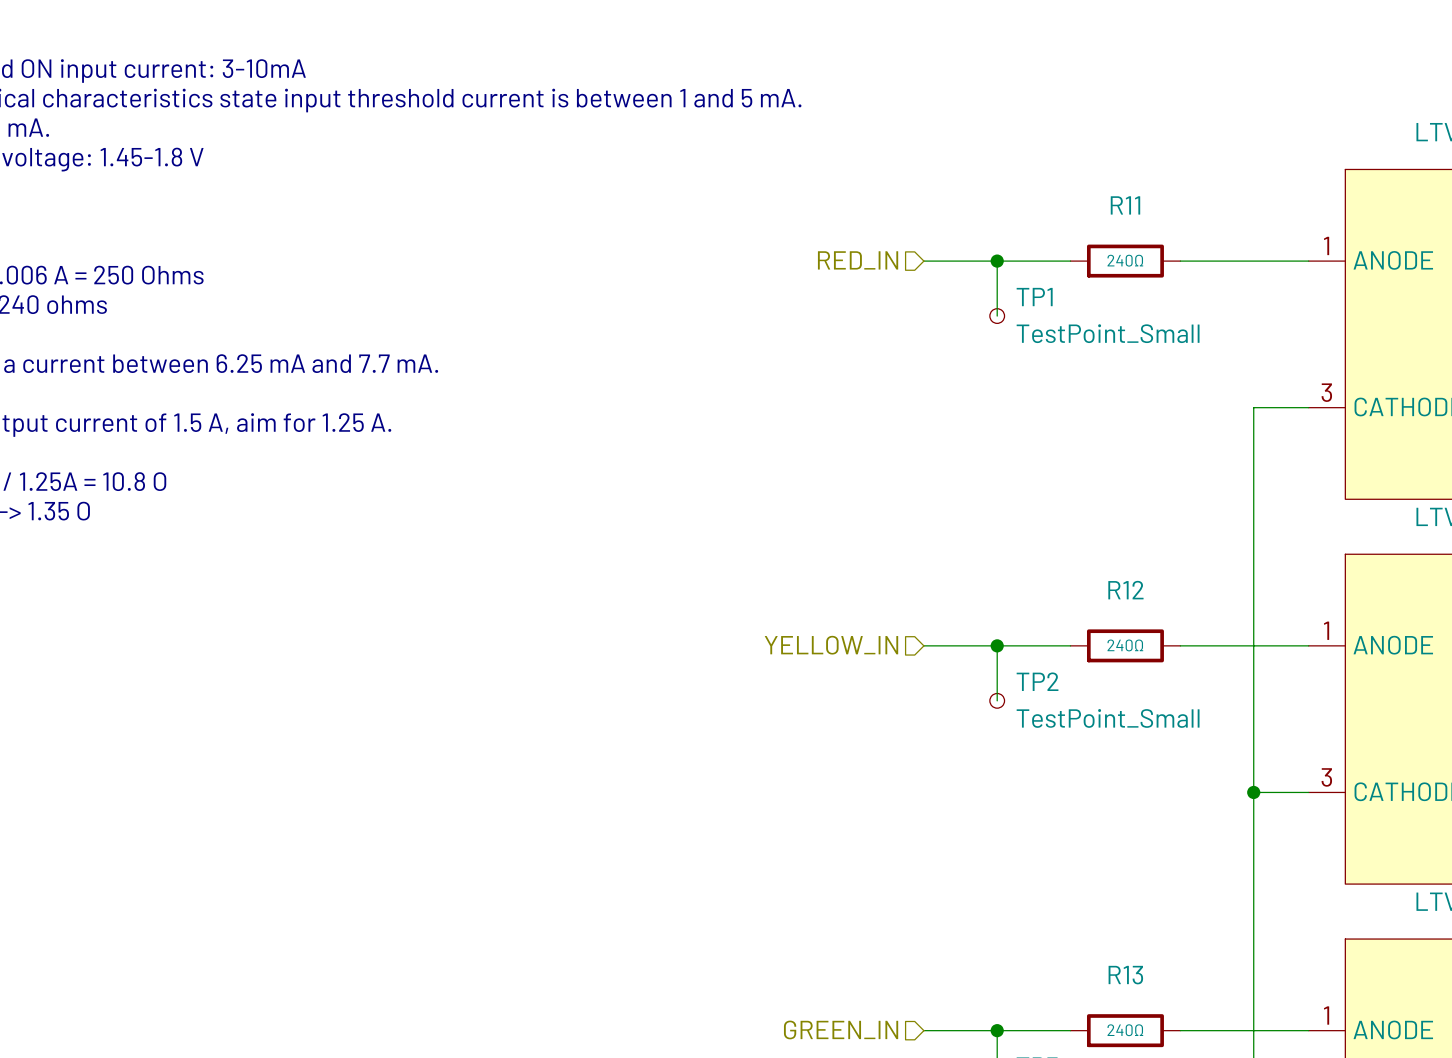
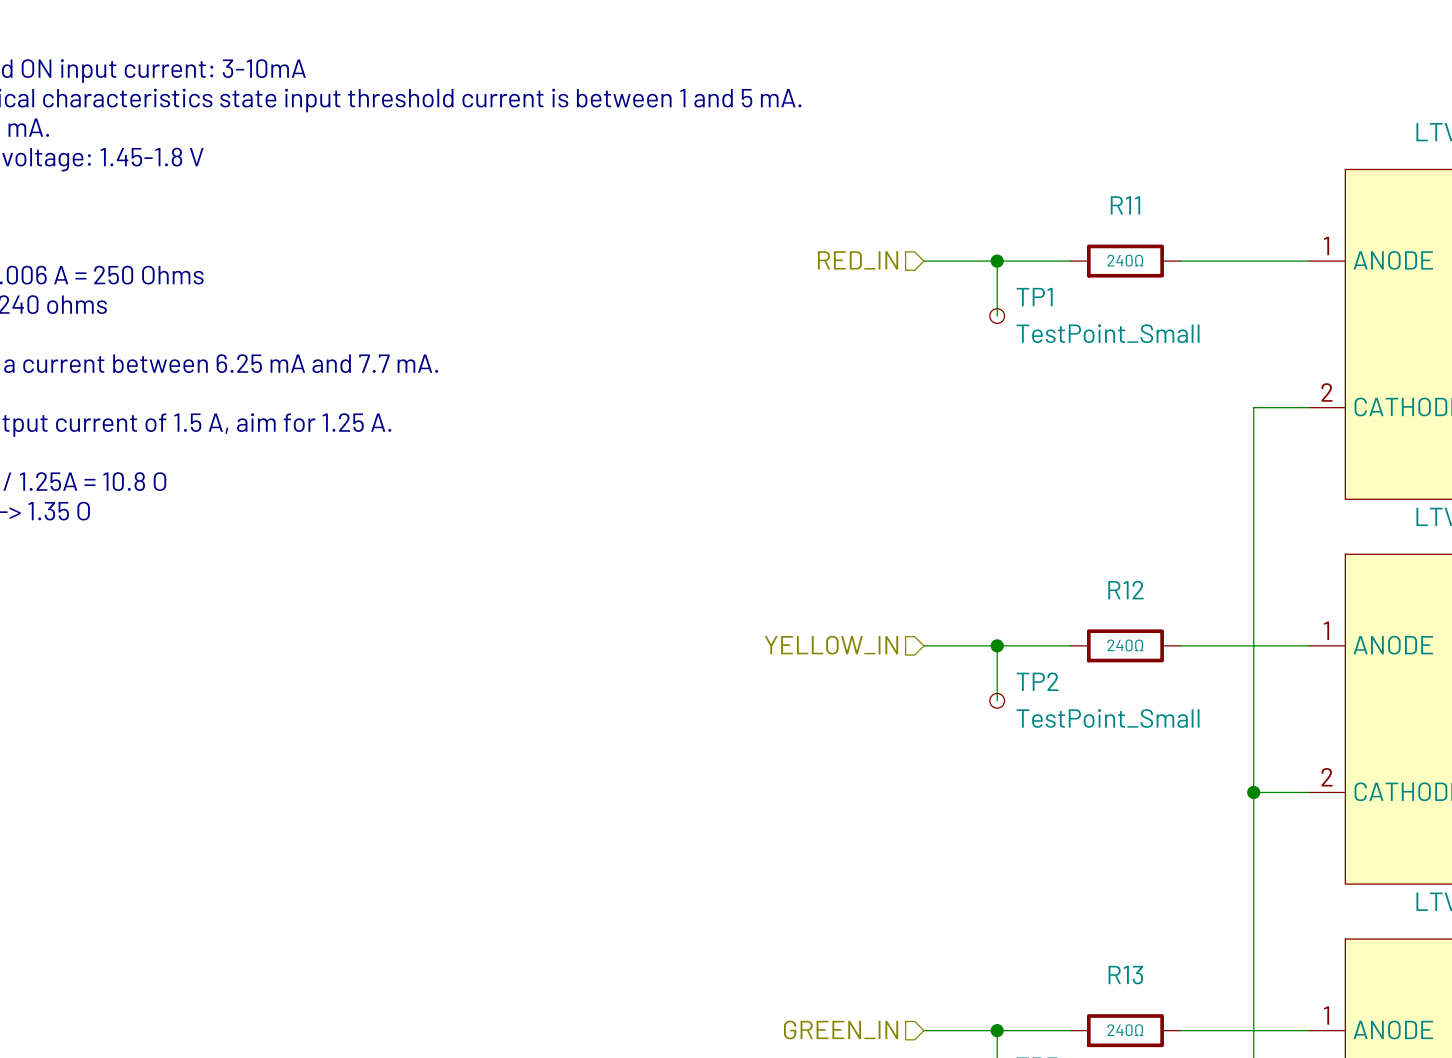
part pin number: 3 (1326, 392) -> 2 (1327, 392)
part pin number: 3 (1326, 777) -> 2 (1327, 777)

